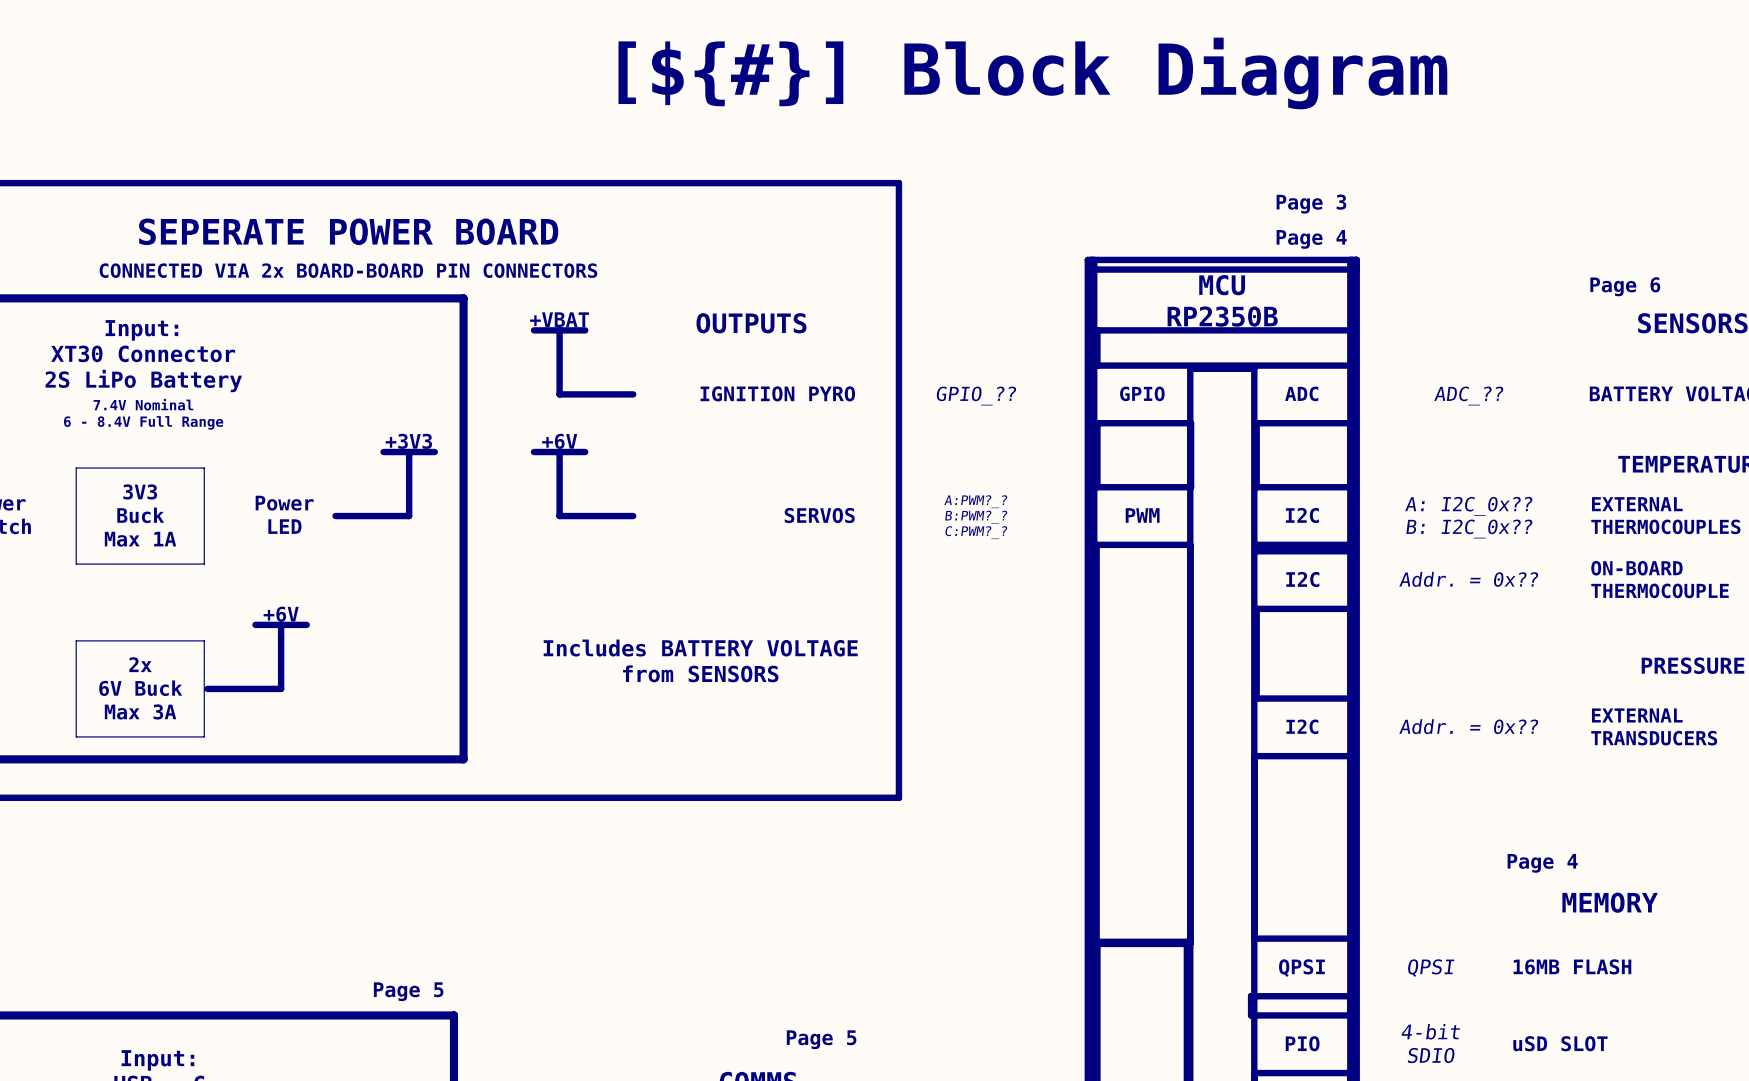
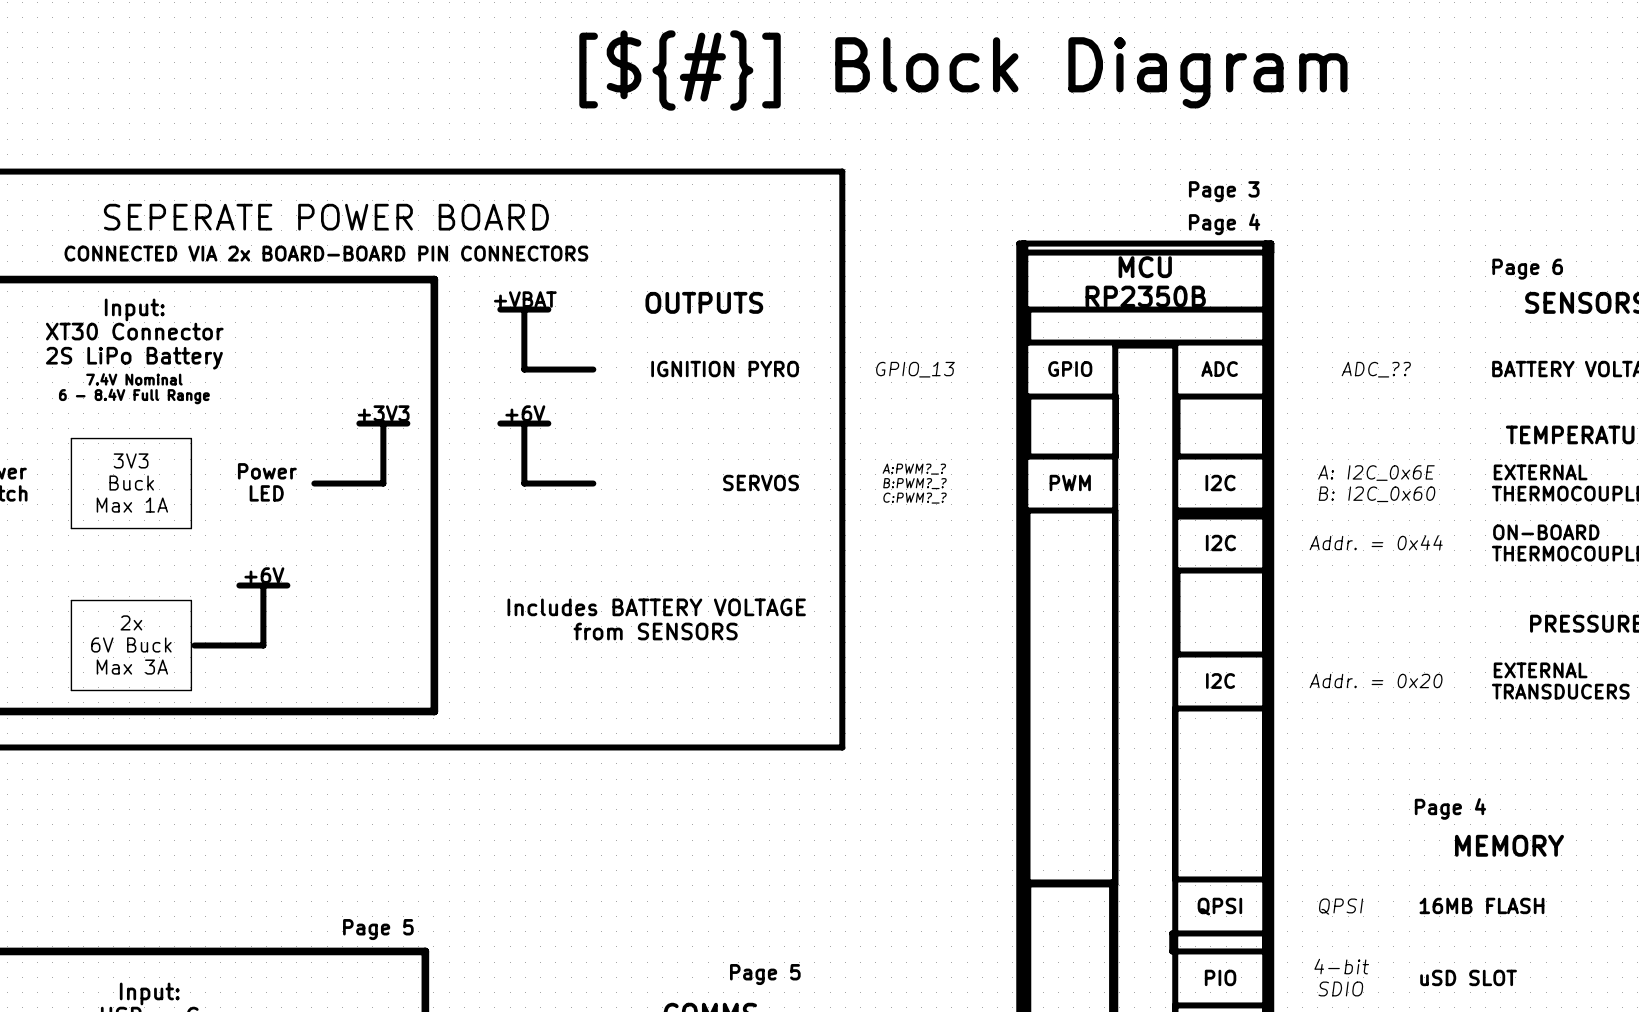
text: GPIO_?? (976, 396) -> GPIO_13 (915, 369)
text: A: I2C_0x?? (1468, 506) -> A: I2C_0x6E (1376, 473)
text: B: I2C_0x?? (1469, 529) -> B: I2C_0x60 (1377, 494)
text: Addr. = 0x?? (1468, 579) -> Addr. = 0x44 (1376, 542)
text: Addr. = 0x?? (1468, 726) -> Addr. = 0x20 (1376, 681)

